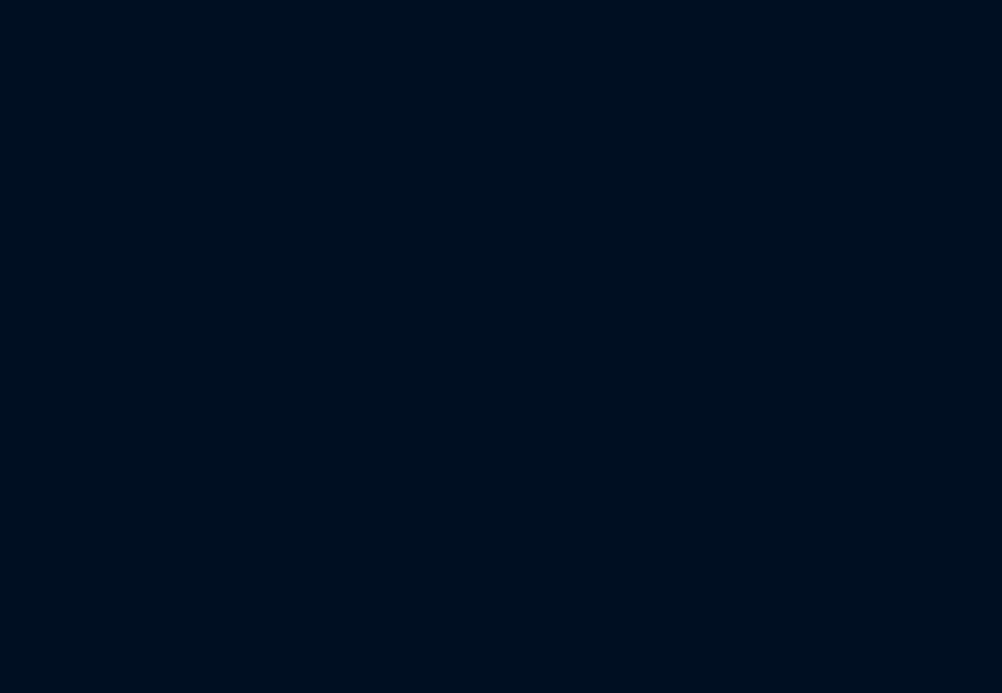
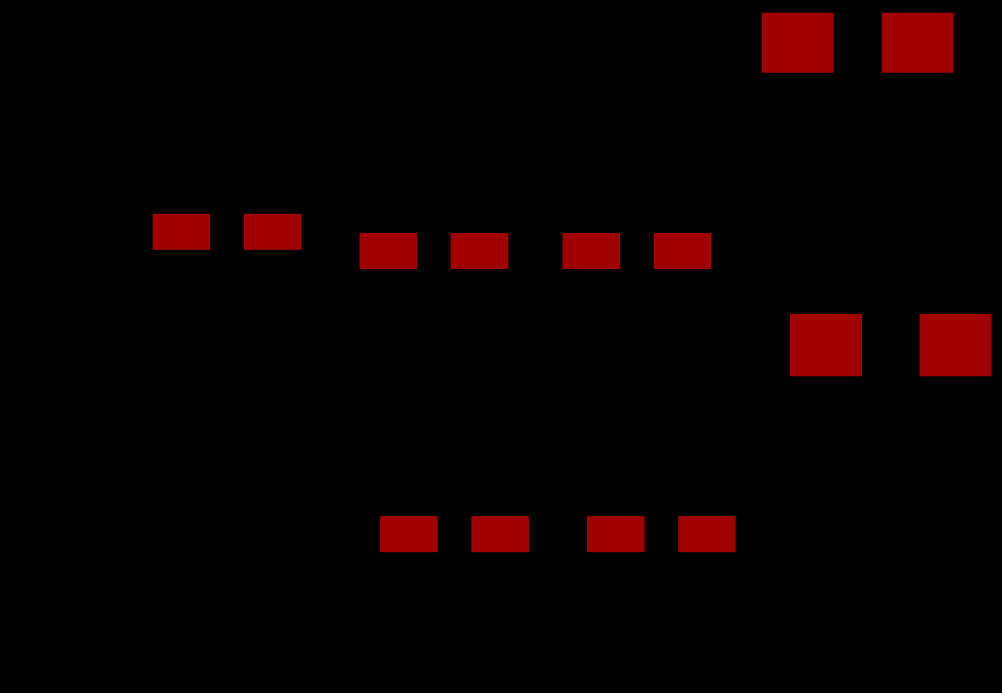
part: none -> (857, 42)
part: none -> (227, 231)
part: none -> (433, 251)
part: none -> (636, 251)
part: none -> (890, 345)
part: none -> (454, 534)
part: none -> (661, 534)

